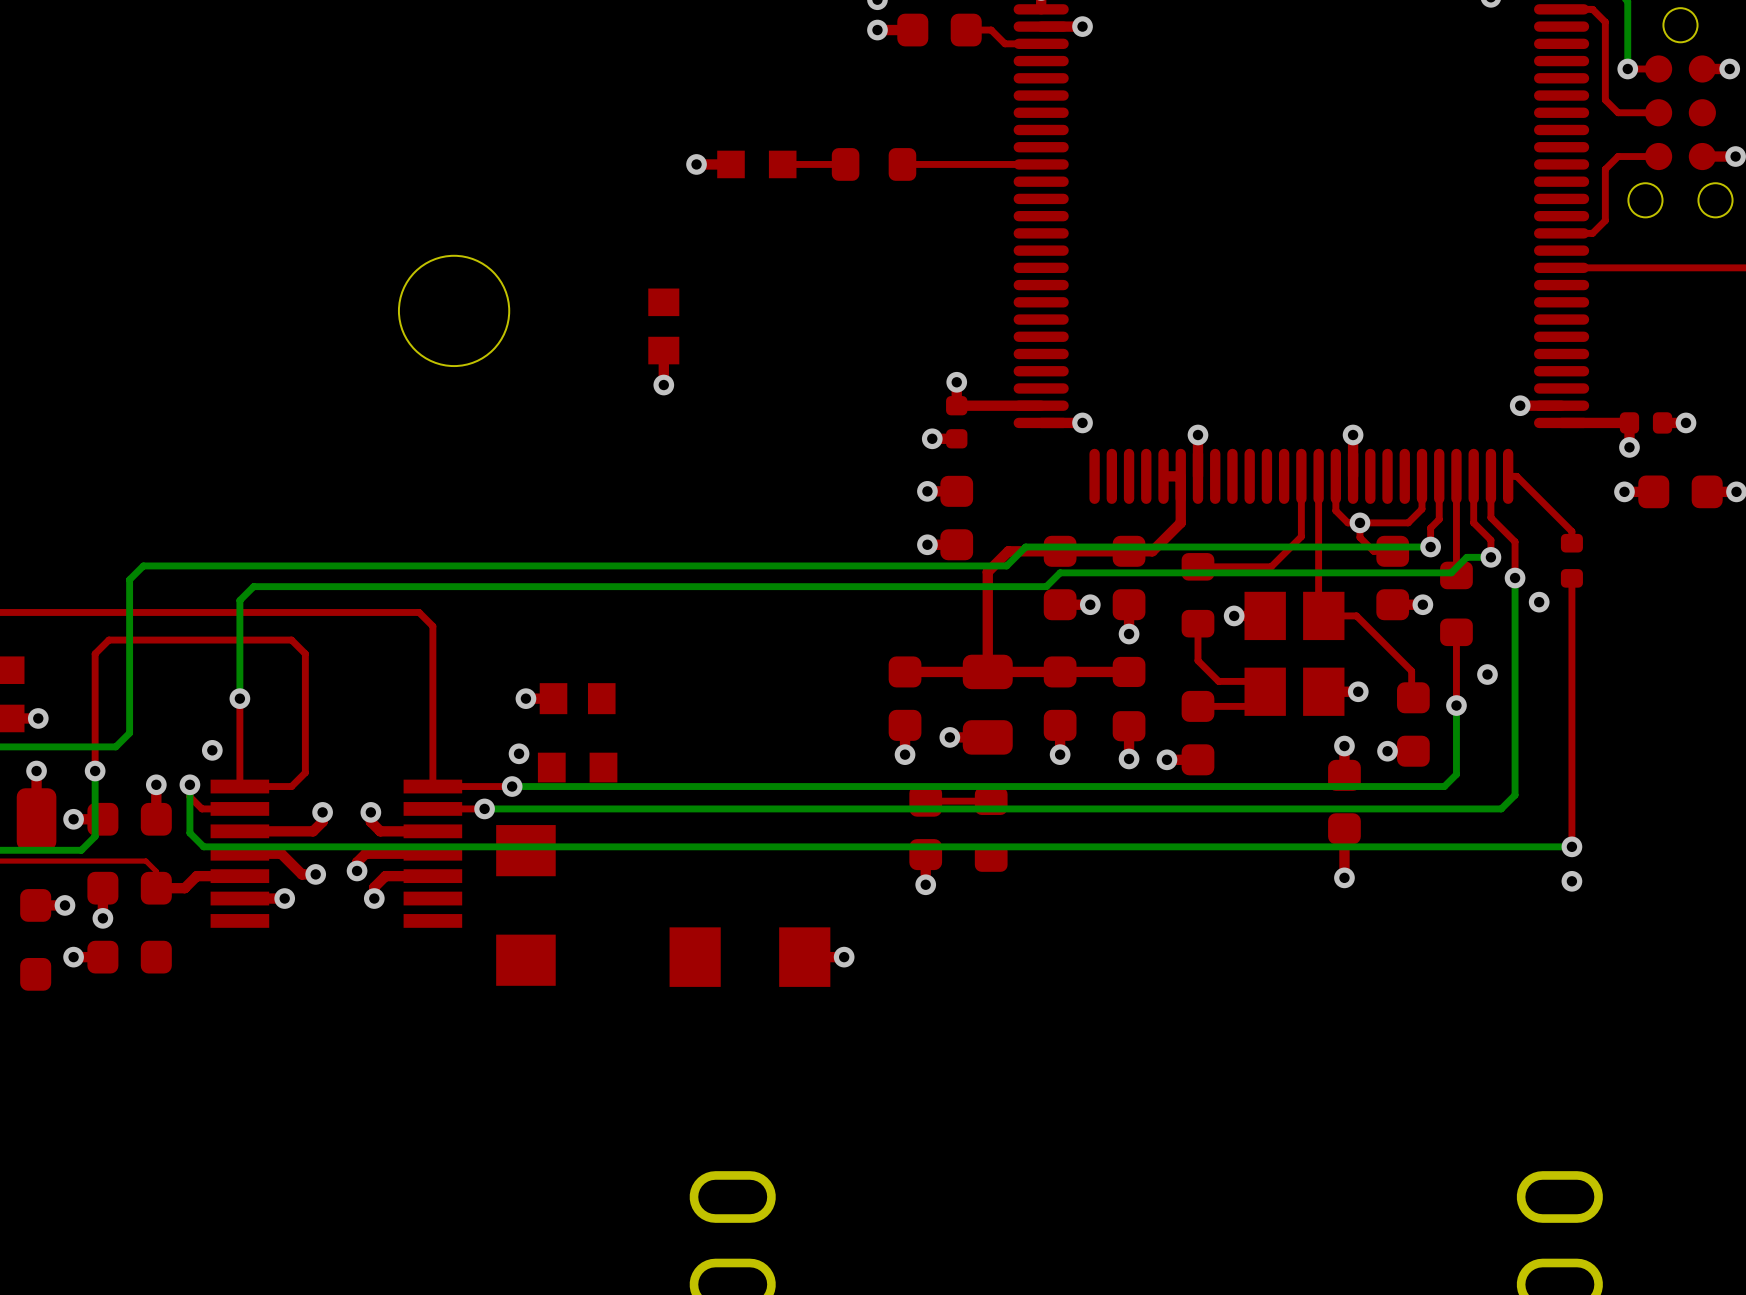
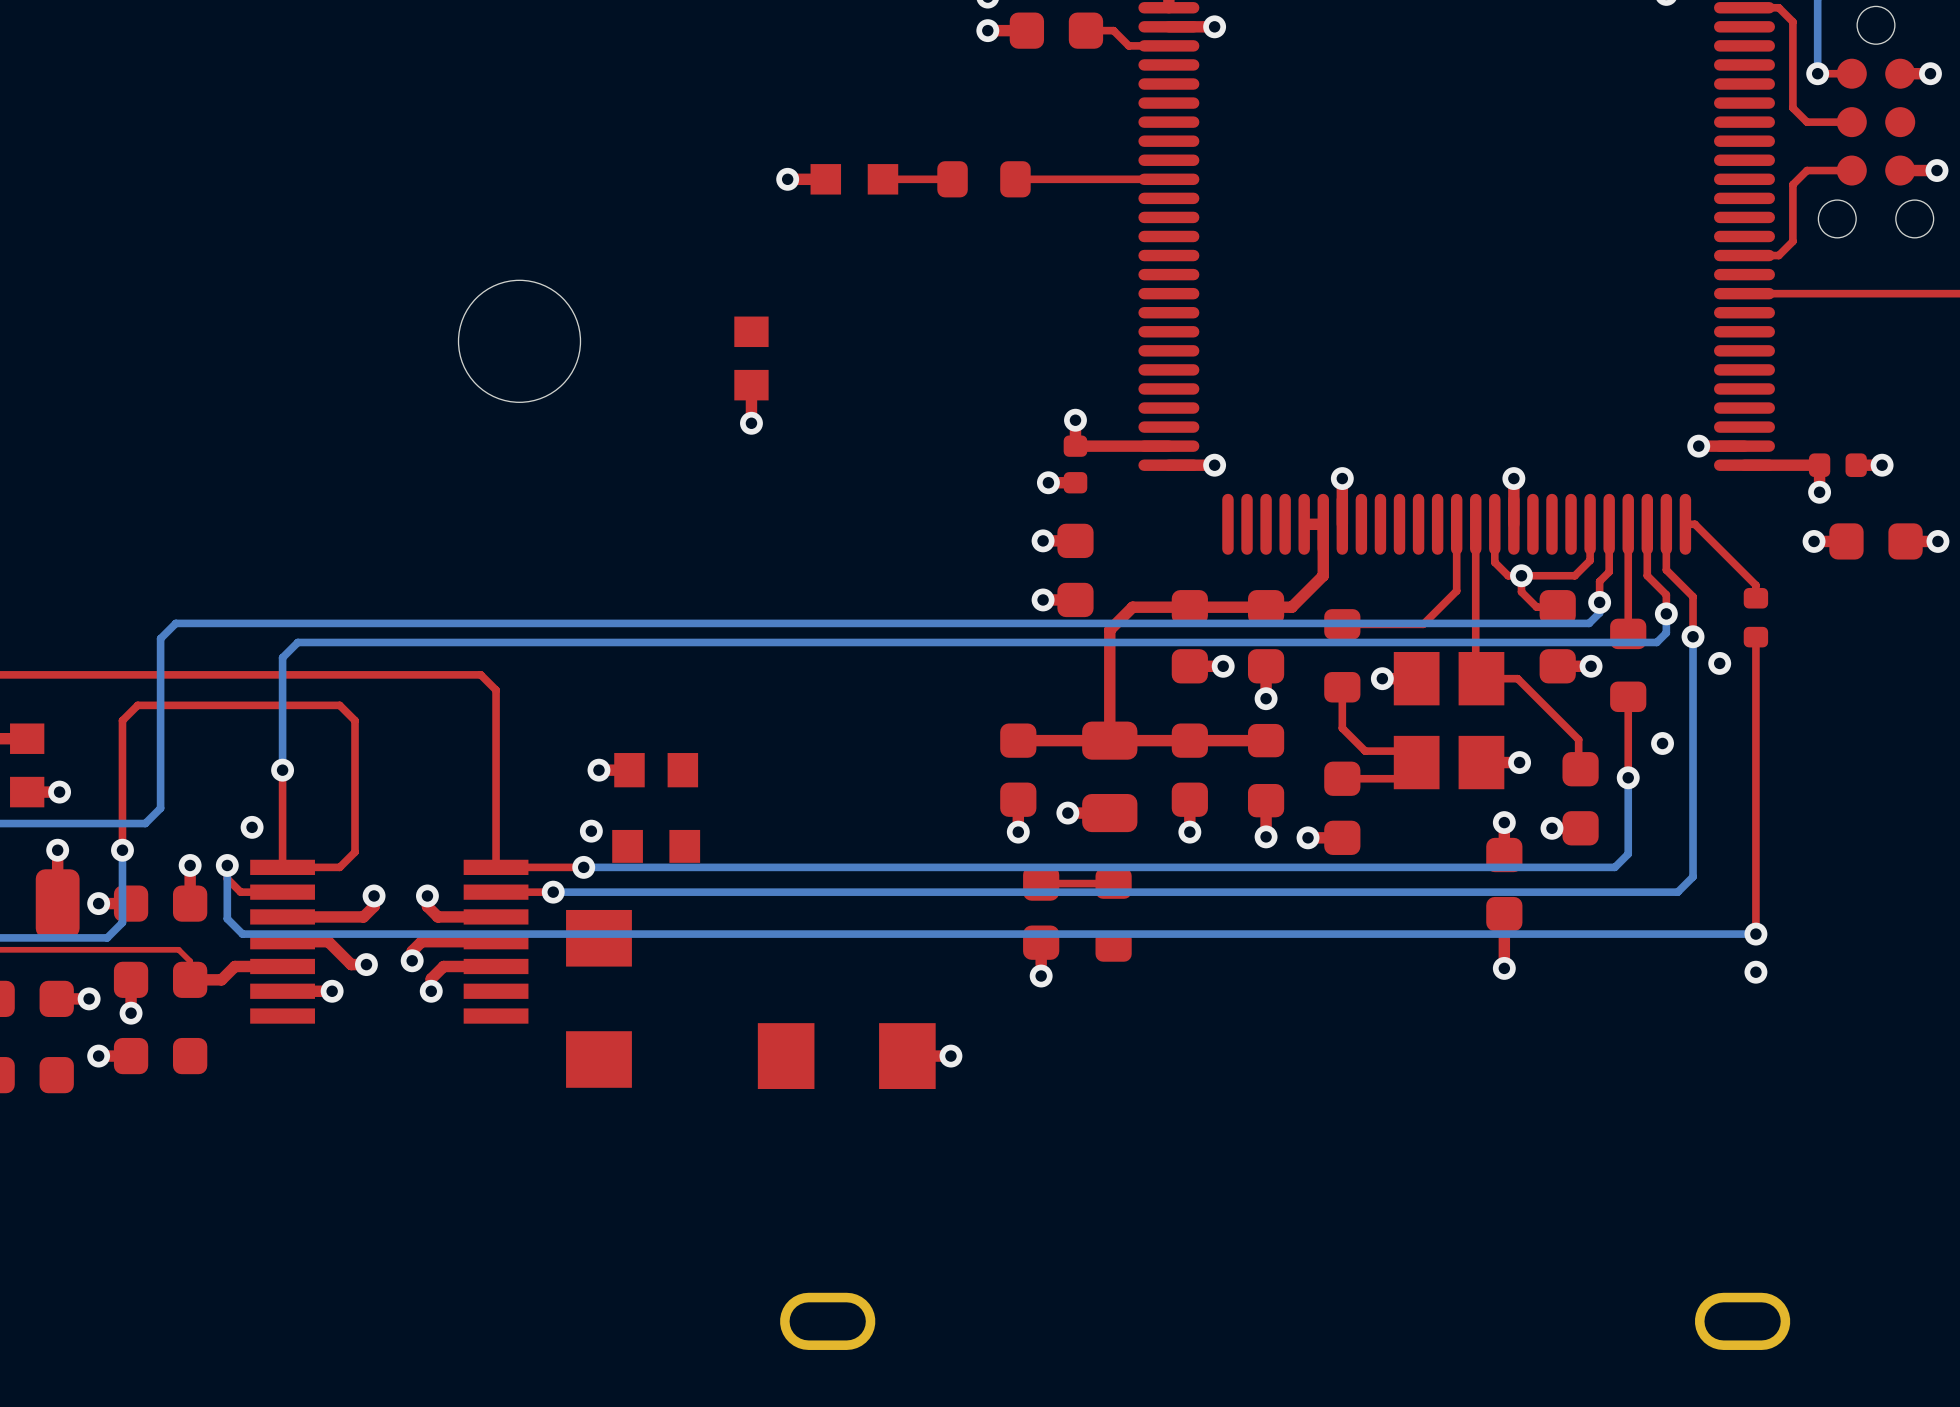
bottom track: (1430, 547) (1025, 547) (1006, 565) -> (1599, 596) (1599, 612) (1589, 623) (1130, 623)
bottom track: (1490, 557) (1466, 557) (1451, 572) (1060, 572) (1046, 586) (253, 586) (239, 600) -> (1666, 613) (1666, 632) (1656, 642) (297, 642) (282, 657) (282, 661)

